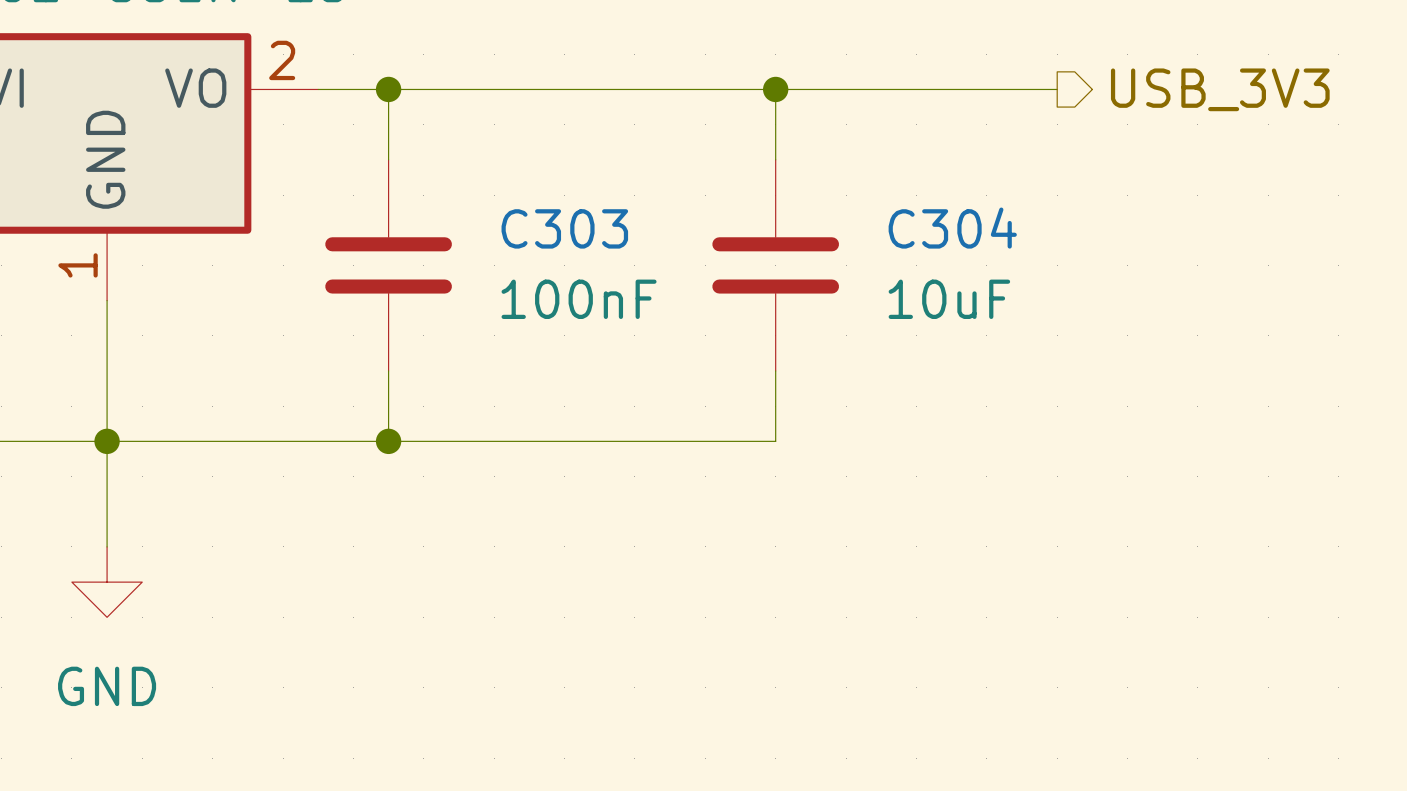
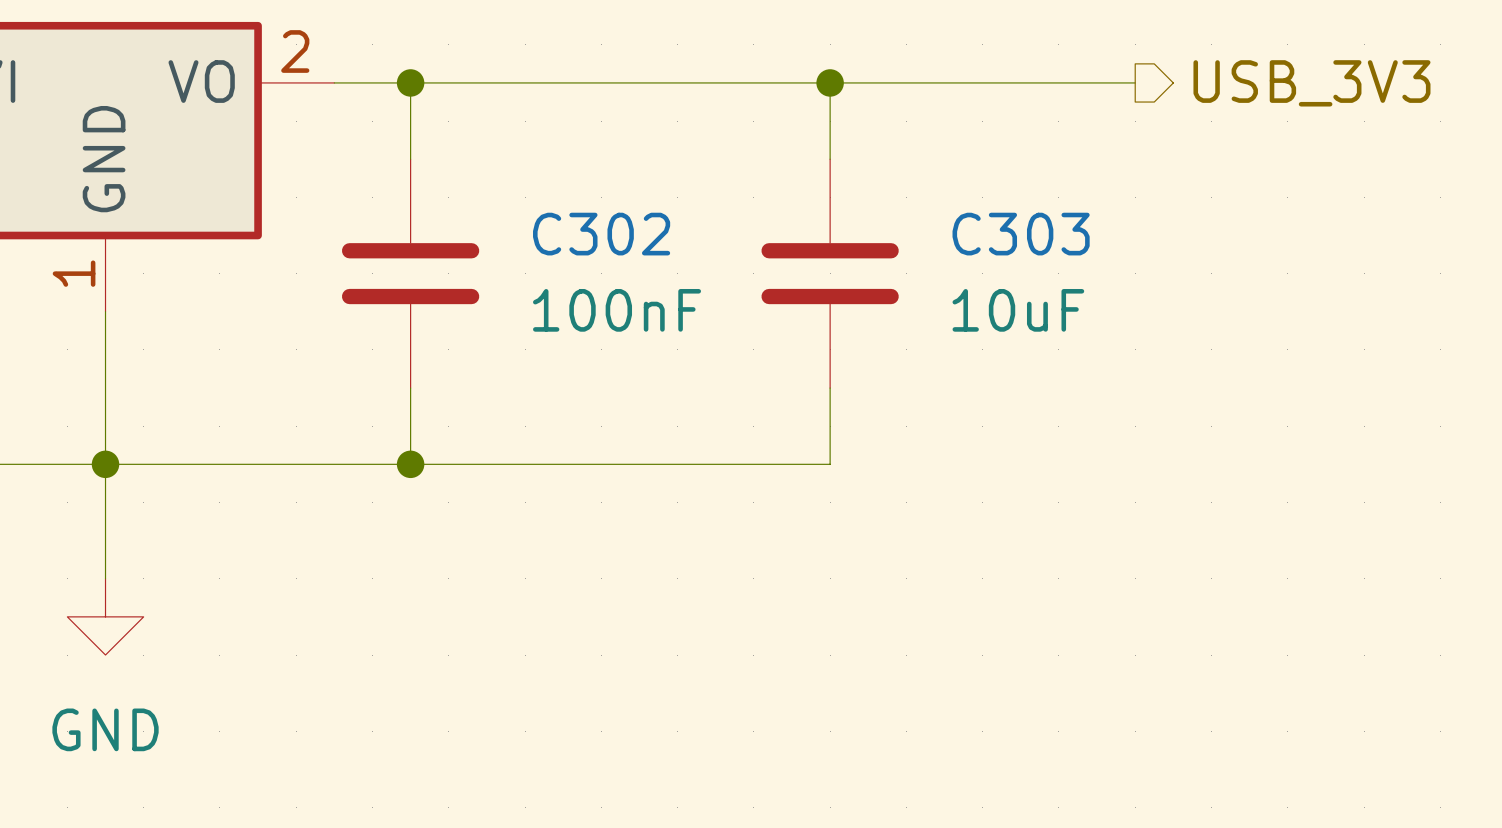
C303 name: C303 (564, 228) -> C302 (601, 234)
C304 name: C304 (952, 228) -> C303 (1021, 234)

